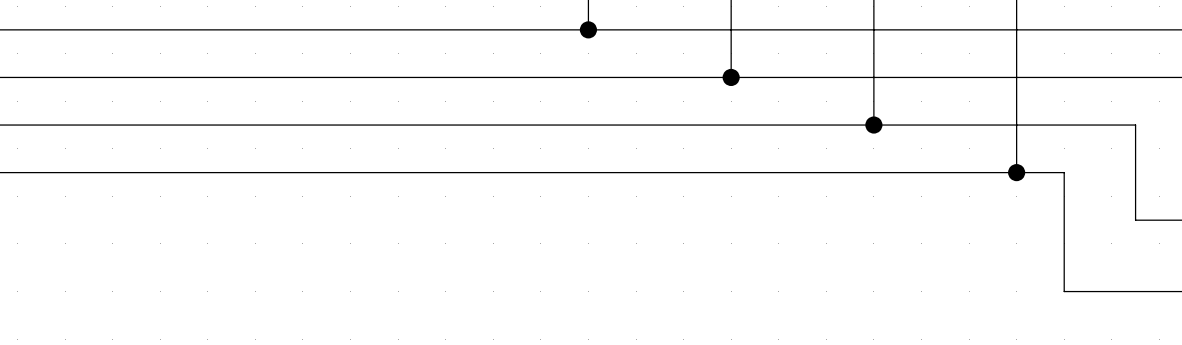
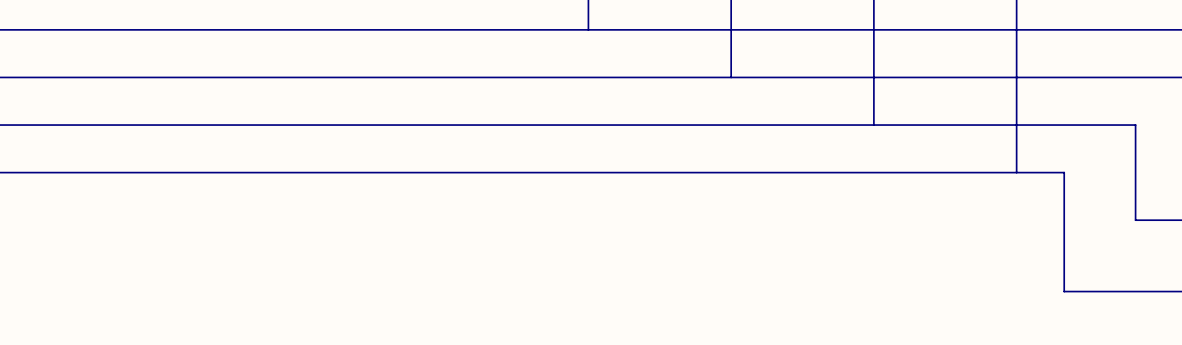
junction: (588, 29) -> none
junction: (731, 77) -> none
junction: (873, 125) -> none
junction: (1016, 172) -> none

